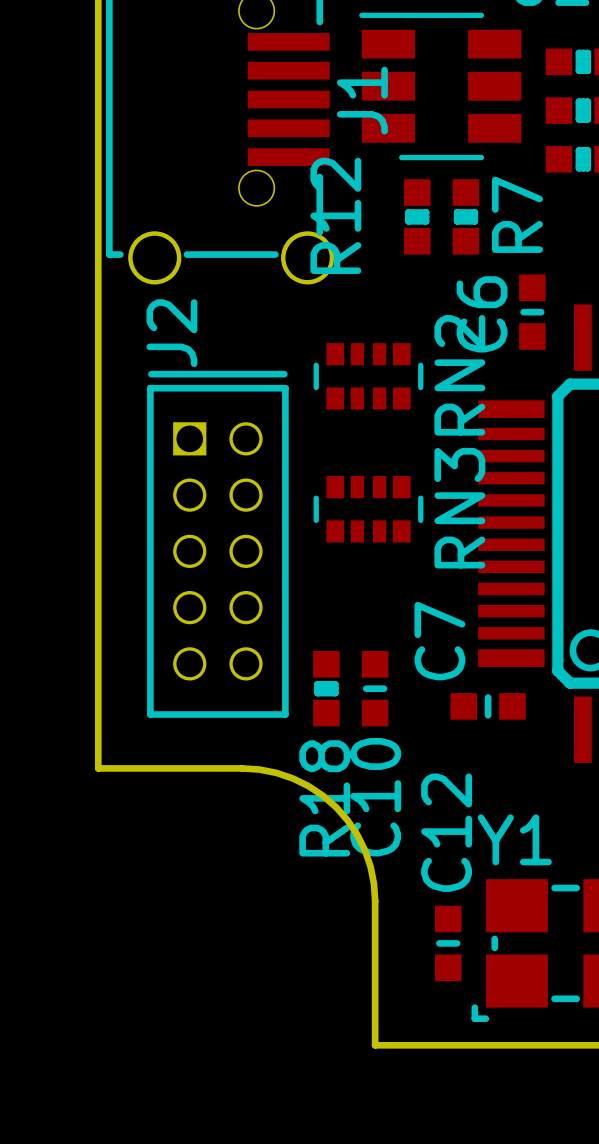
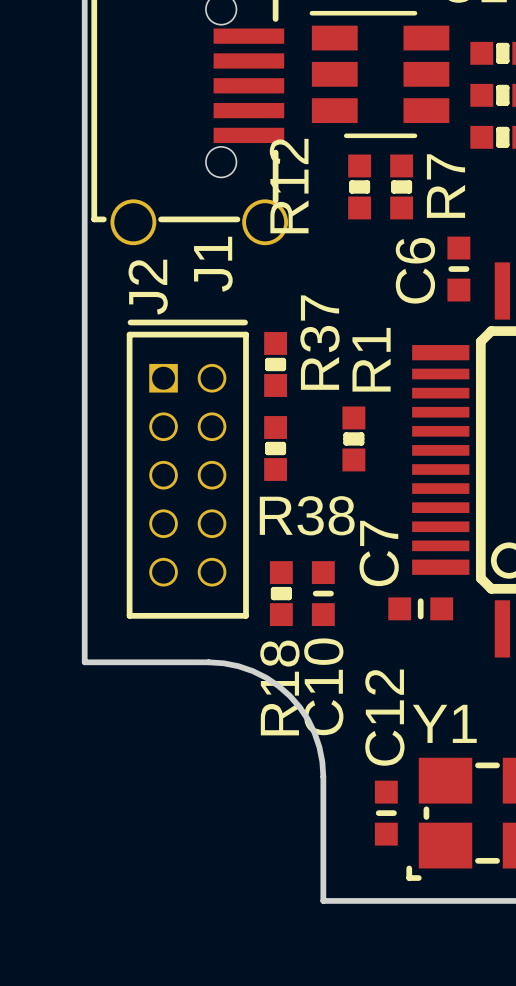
J1 name position: J1 (362, 100) -> J1 (213, 264)
RN2: (368, 376) -> none
R37: none -> (275, 364)
RN3: (368, 509) -> none
R1: none -> (353, 438)
R38: none -> (275, 448)

